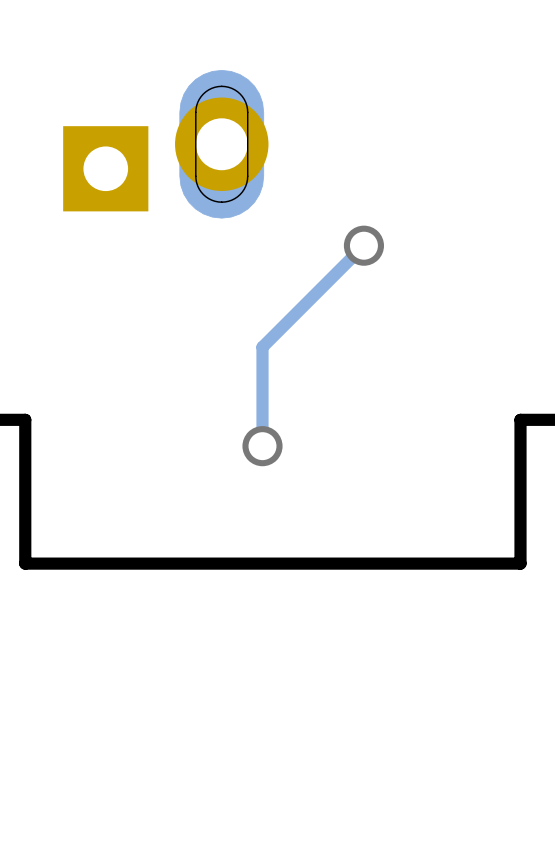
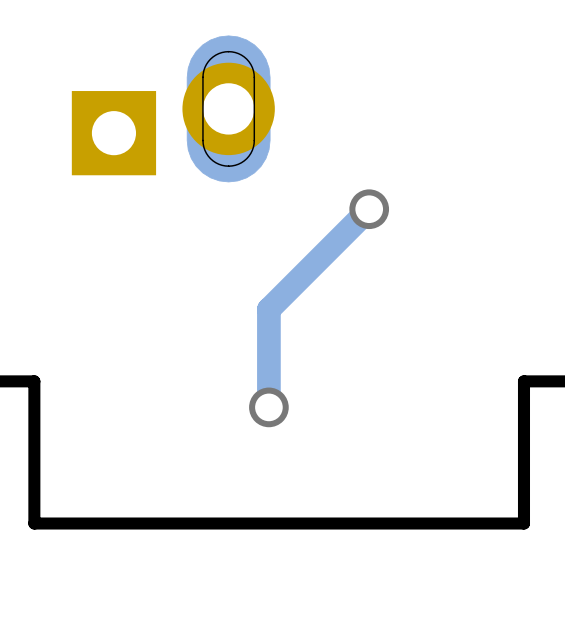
track width: thin (363, 245) (262, 347) (262, 446) -> thick (369, 209) (268, 309) (268, 407)

